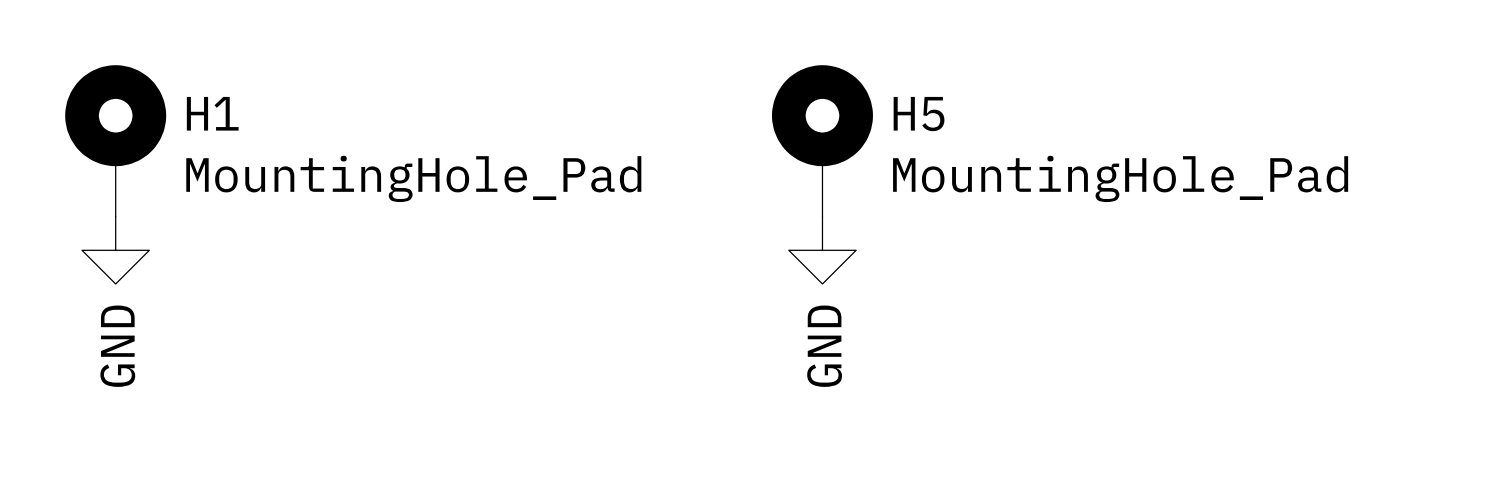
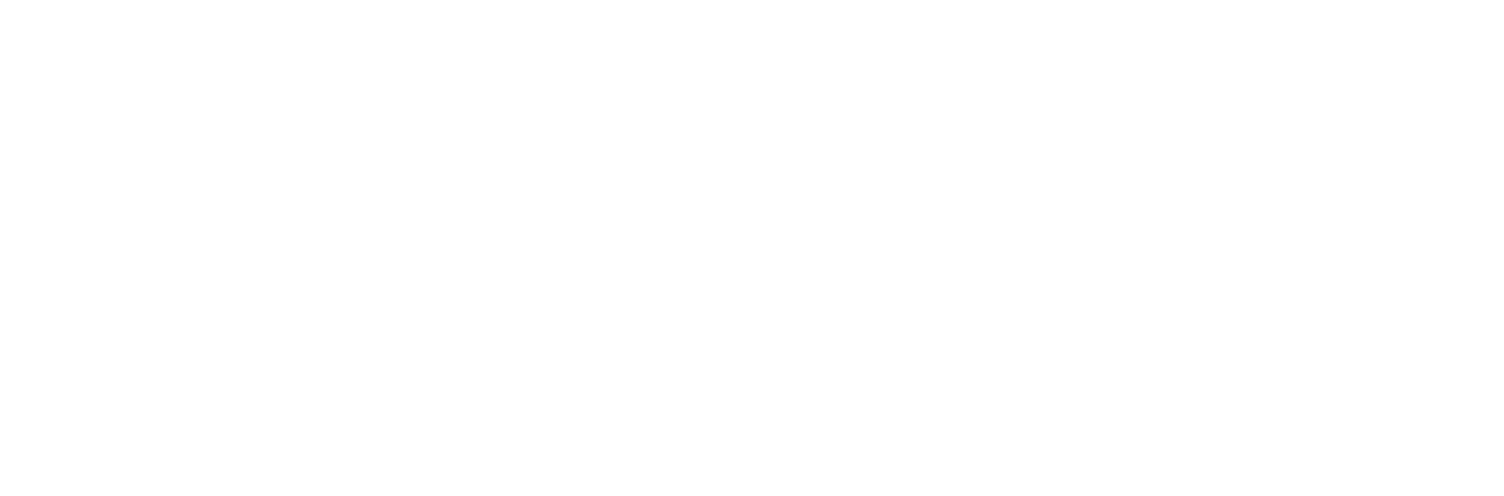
H1: MountingHole_Pad (115, 140) -> none
H5: MountingHole_Pad (822, 140) -> none
power symbol: GND (115, 250) -> none
power symbol: GND (822, 250) -> none

